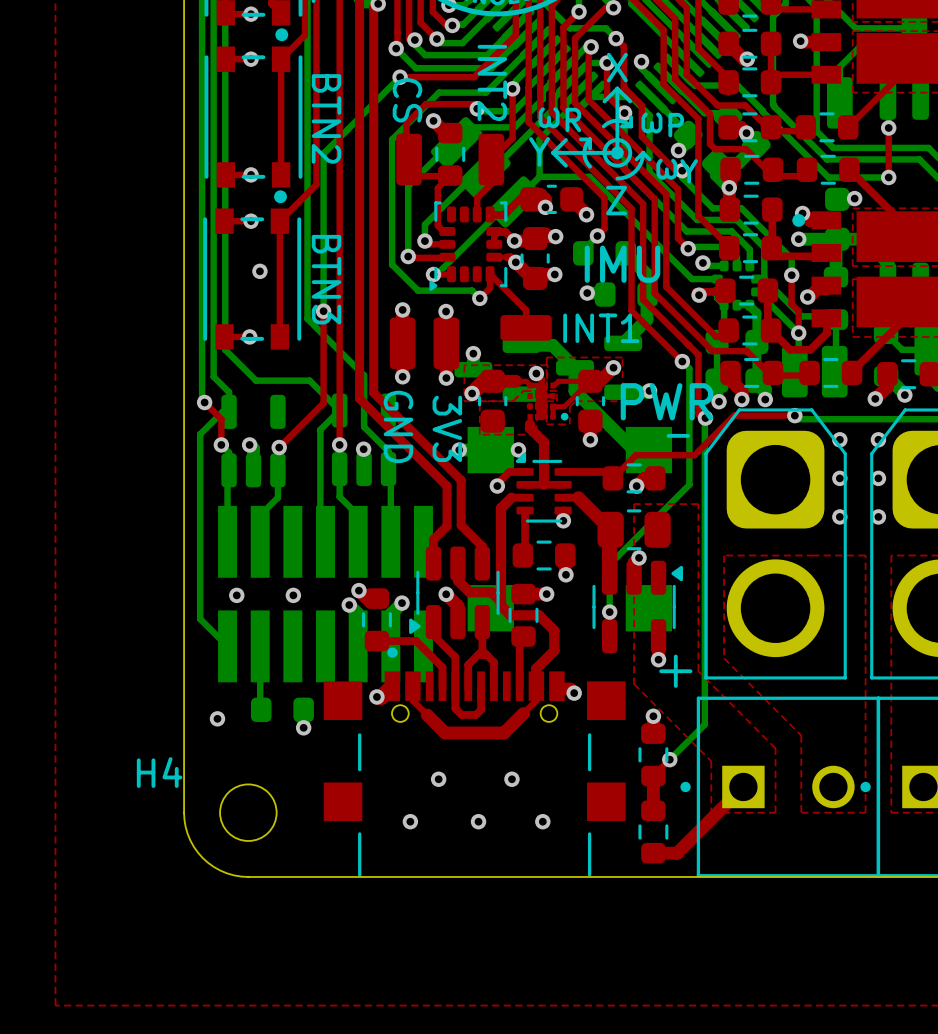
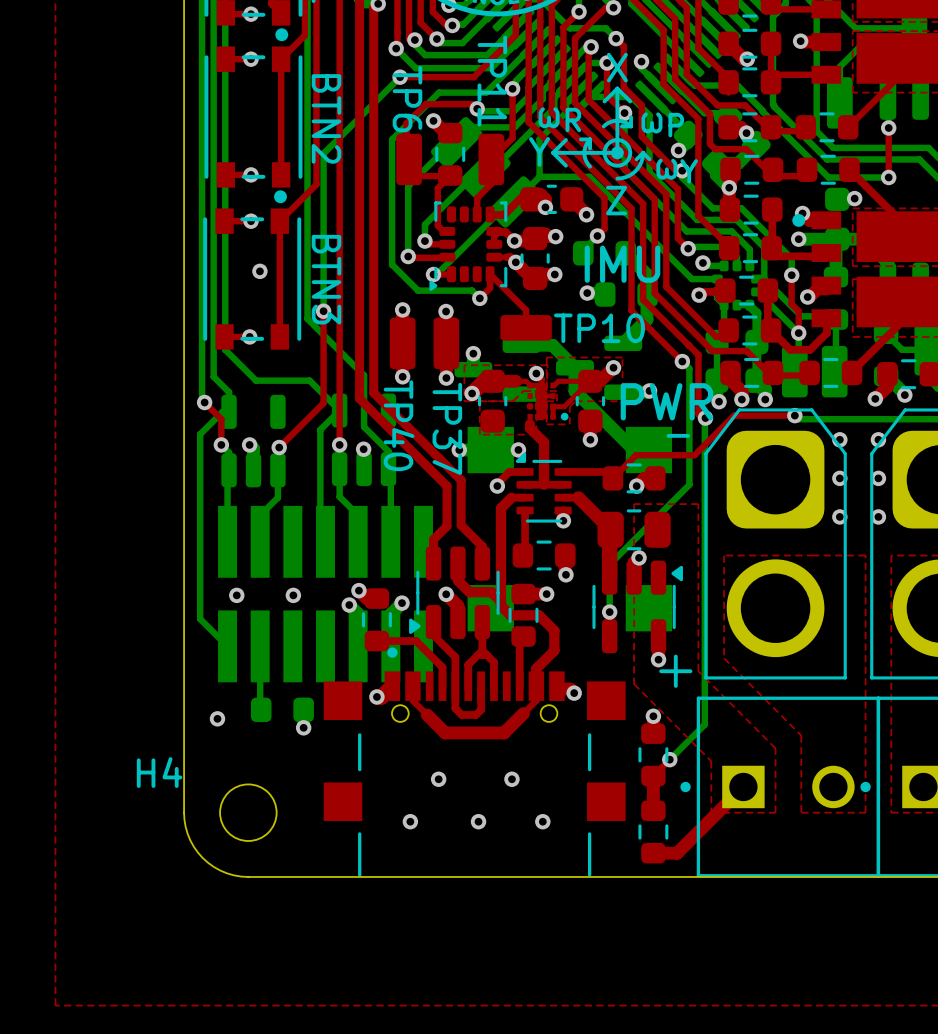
INT2 name: INT2 (492, 82) -> TP11 (492, 81)
CS name: CS (407, 100) -> TP6 (407, 99)
INT1 name: INT1 (601, 328) -> TP10 (599, 328)
GND name: GND (398, 426) -> TP40 (399, 425)
3V3 name: 3V3 (447, 428) -> TP37 (447, 428)

